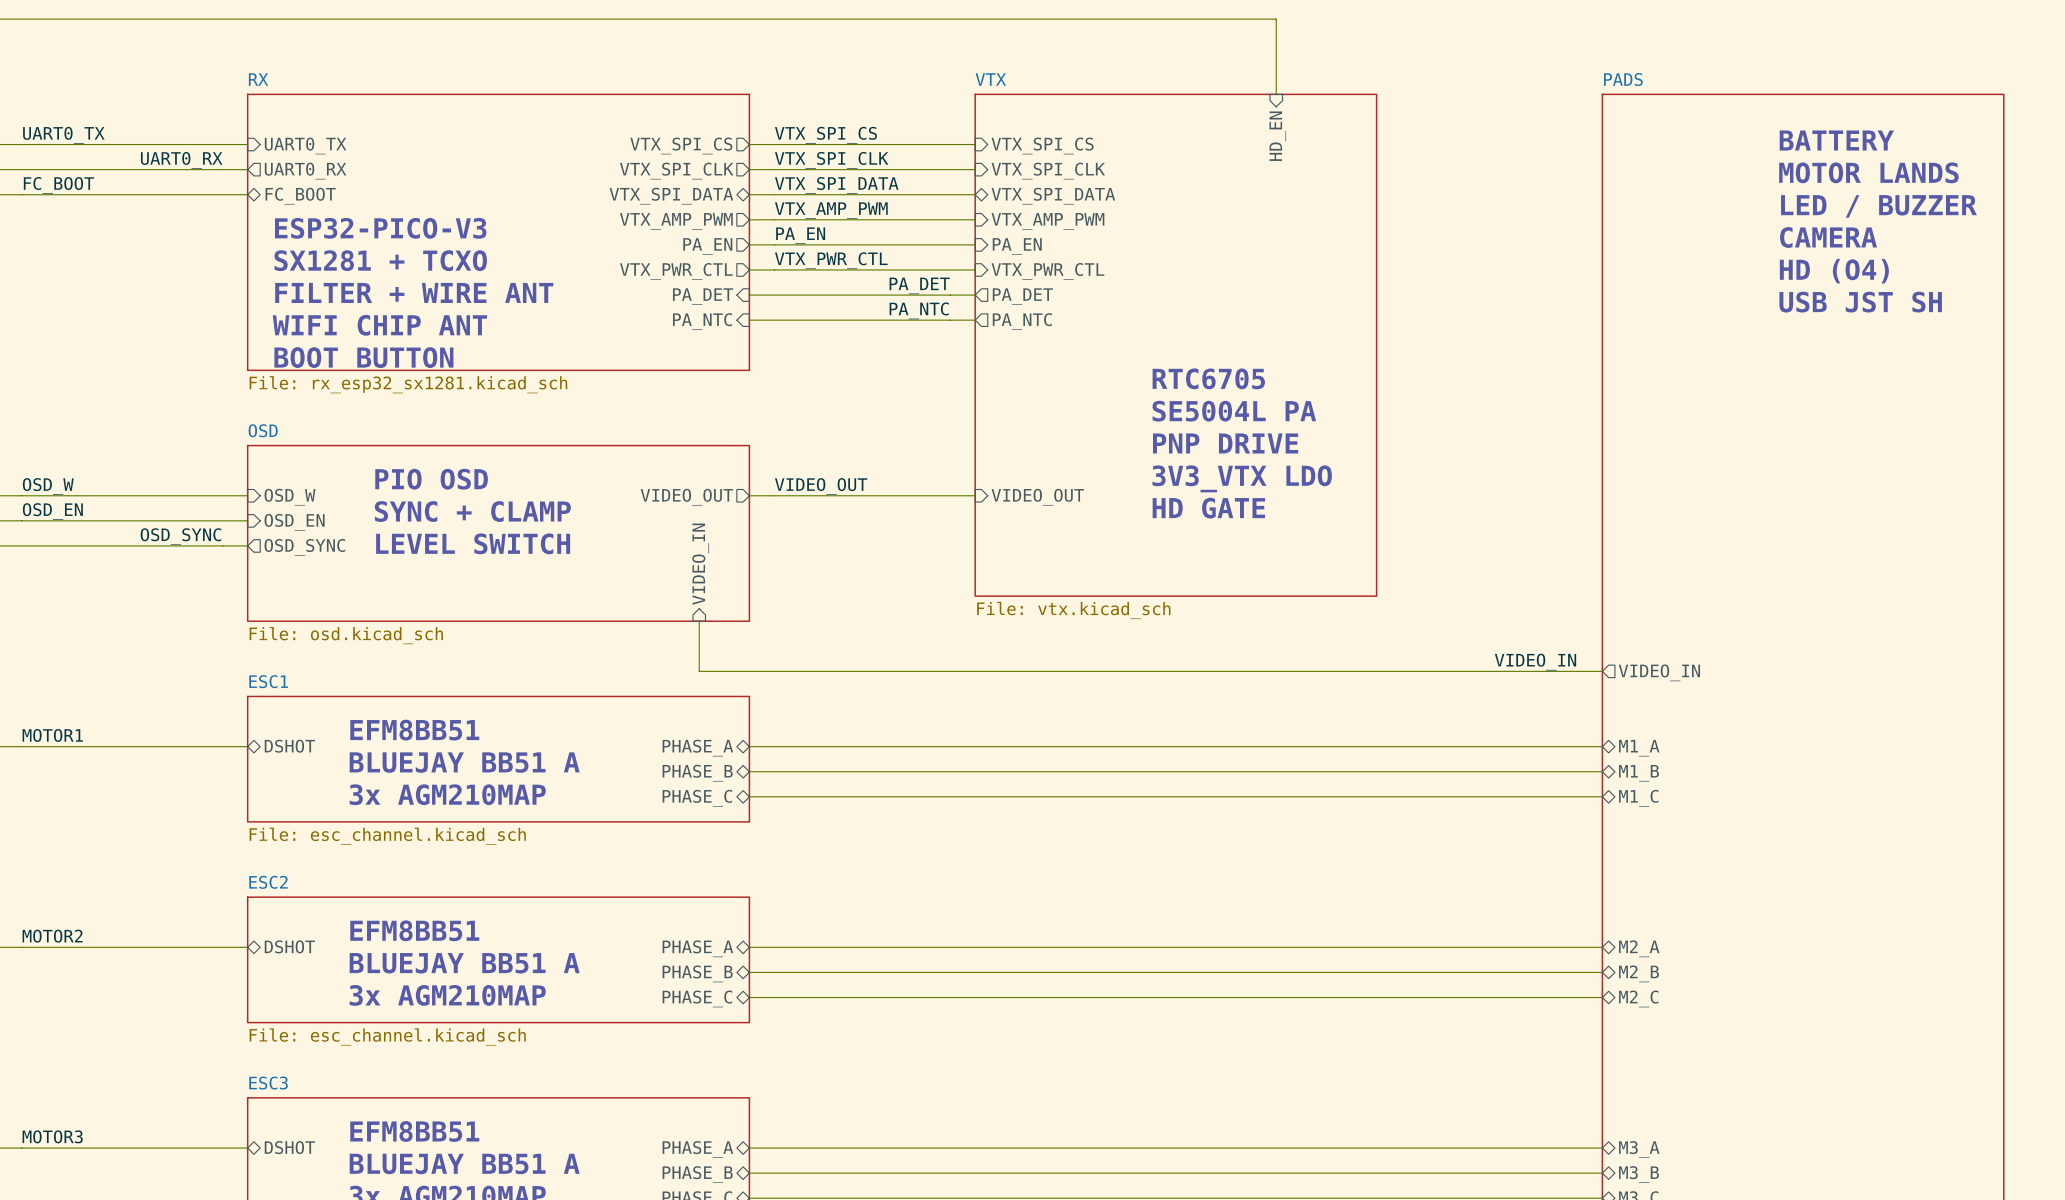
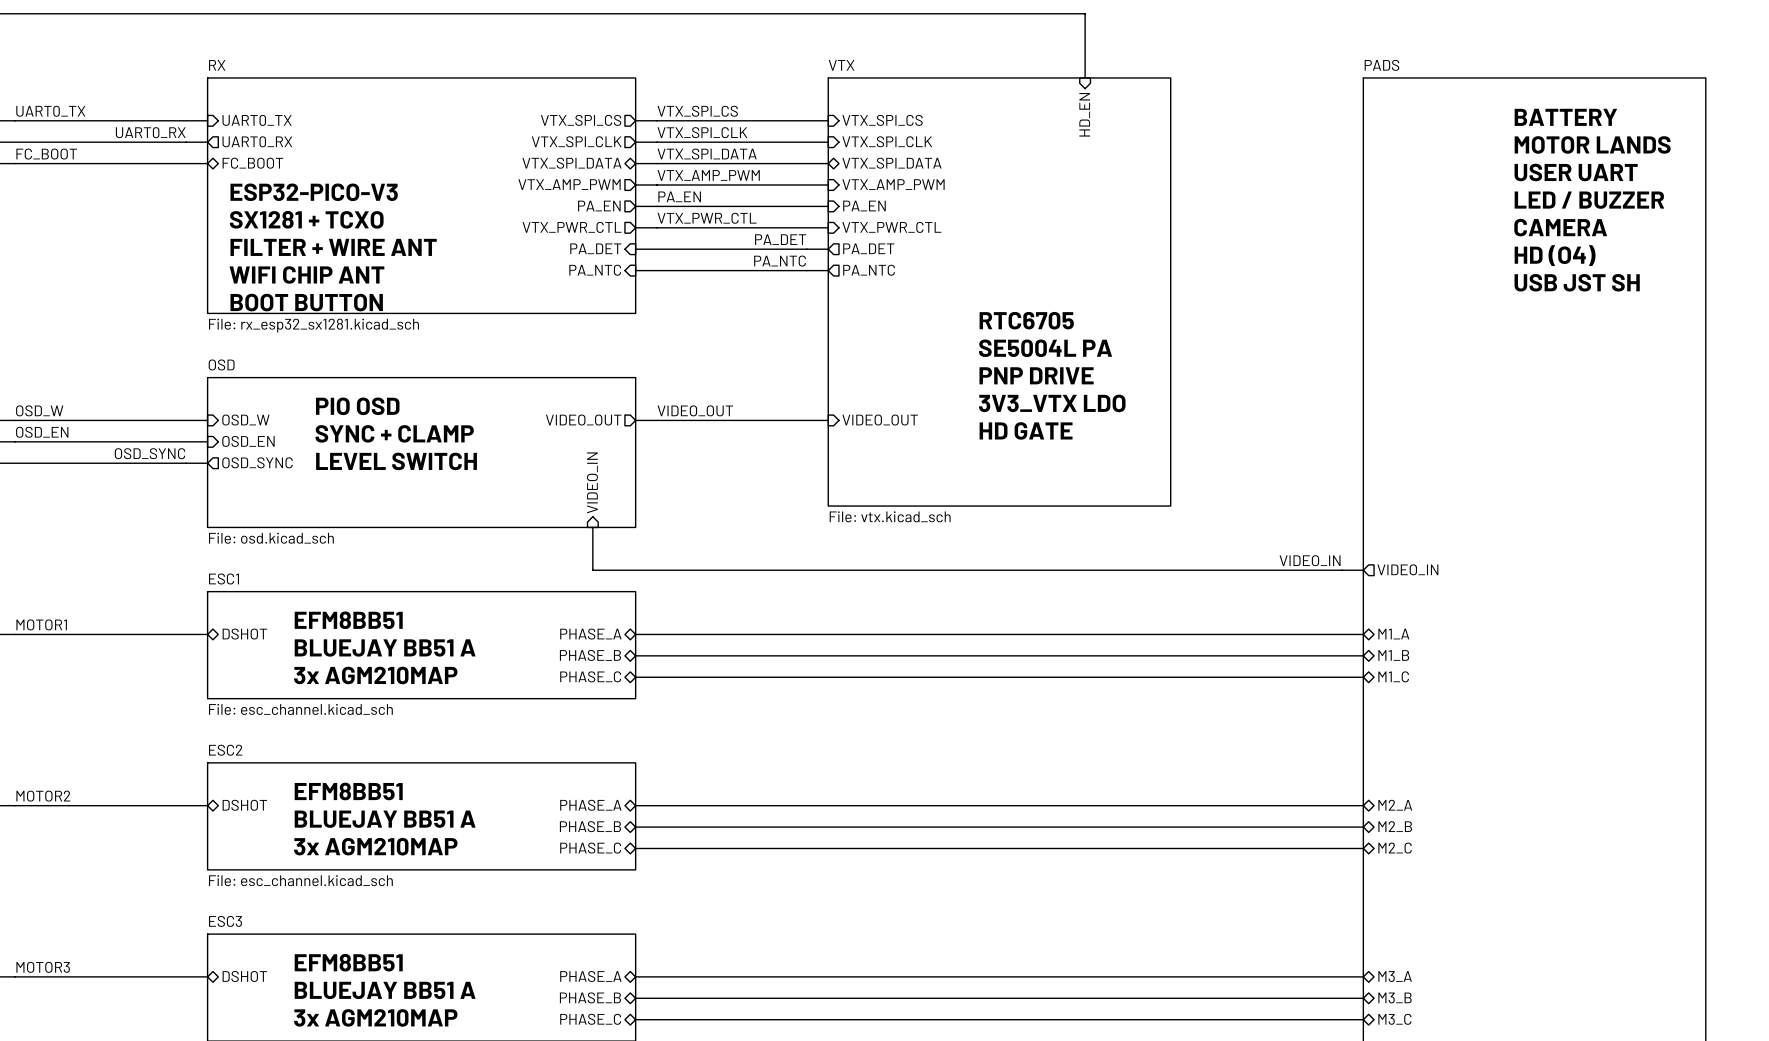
text: LED / BUZZER (1878, 206) -> USER UART (1576, 172)
text: CAMERA (1828, 237) -> LED / BUZZER (1589, 200)
text: HD (O4) (1834, 271) -> CAMERA (1560, 227)
text: USB JST SH (1860, 302) -> HD (O4) (1555, 255)
text: none -> USB JST SH (1577, 282)

